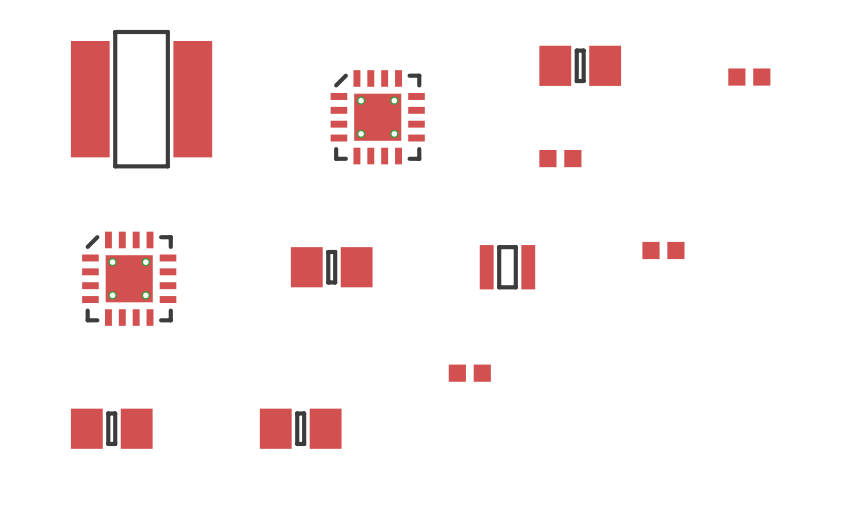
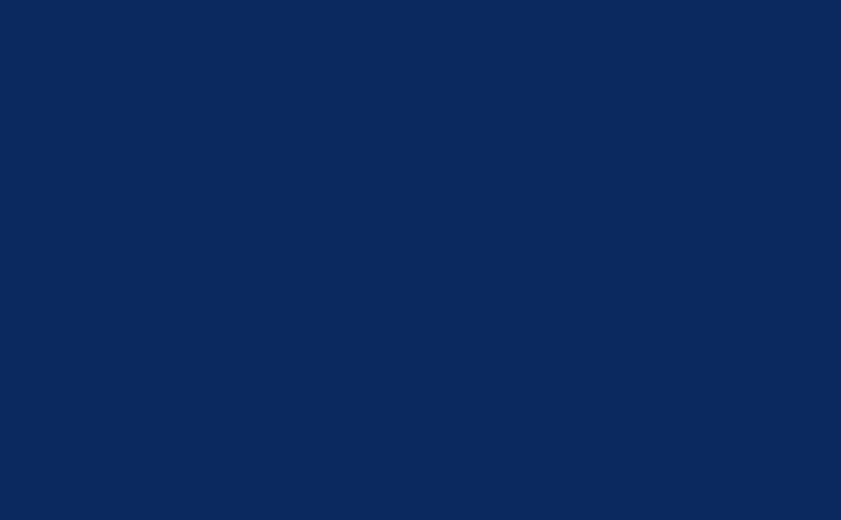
part: (580, 65) -> none
part: (749, 77) -> none
part: (141, 99) -> none
part: (377, 117) -> none
part: (560, 158) -> none
part: (663, 250) -> none
part: (331, 267) -> none
part: (507, 267) -> none
part: (129, 278) -> none
part: (469, 373) -> none
part: (111, 428) -> none
part: (300, 428) -> none

